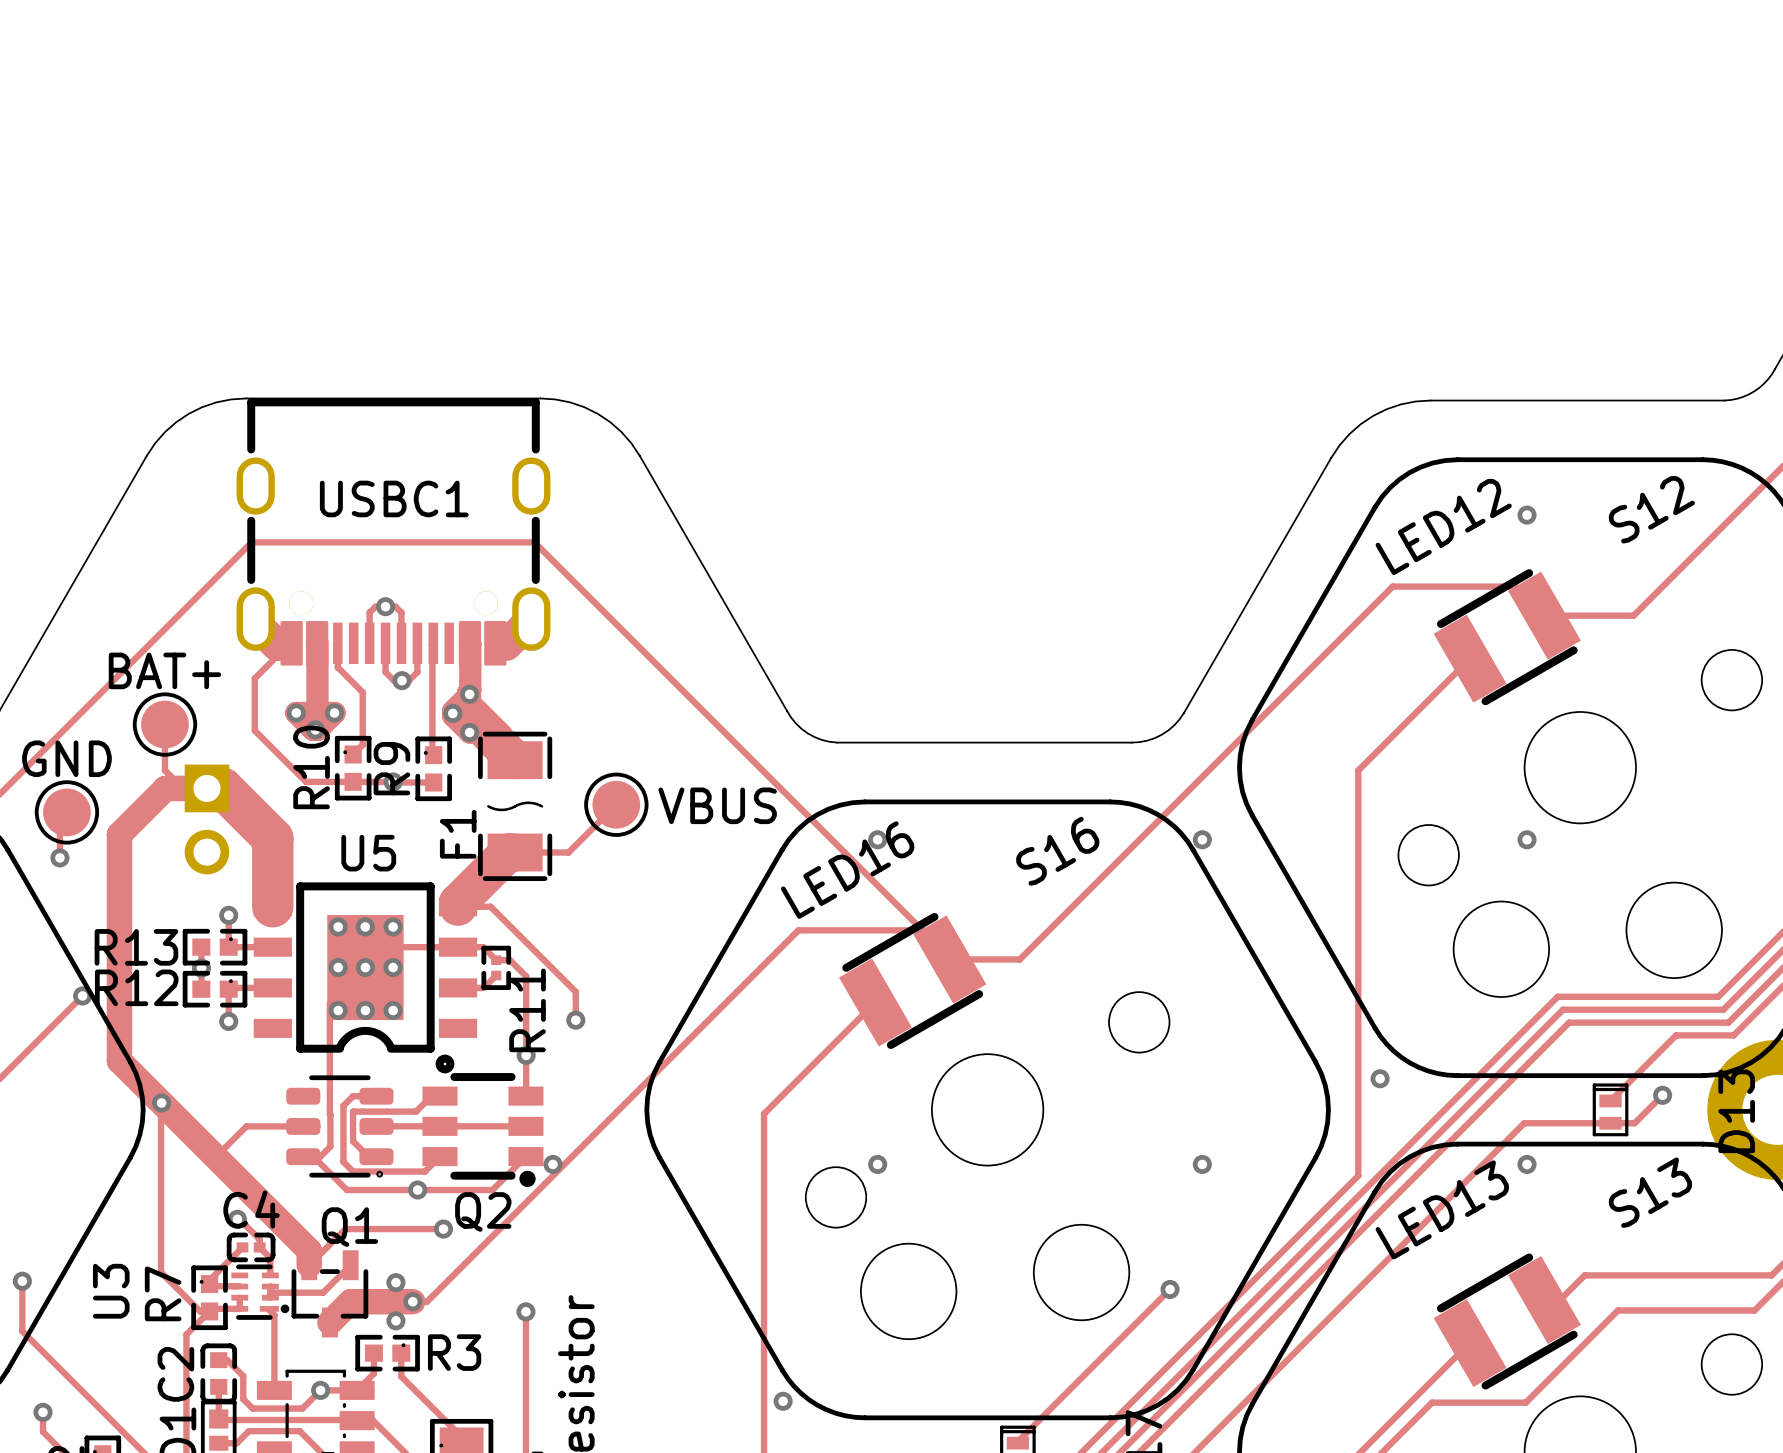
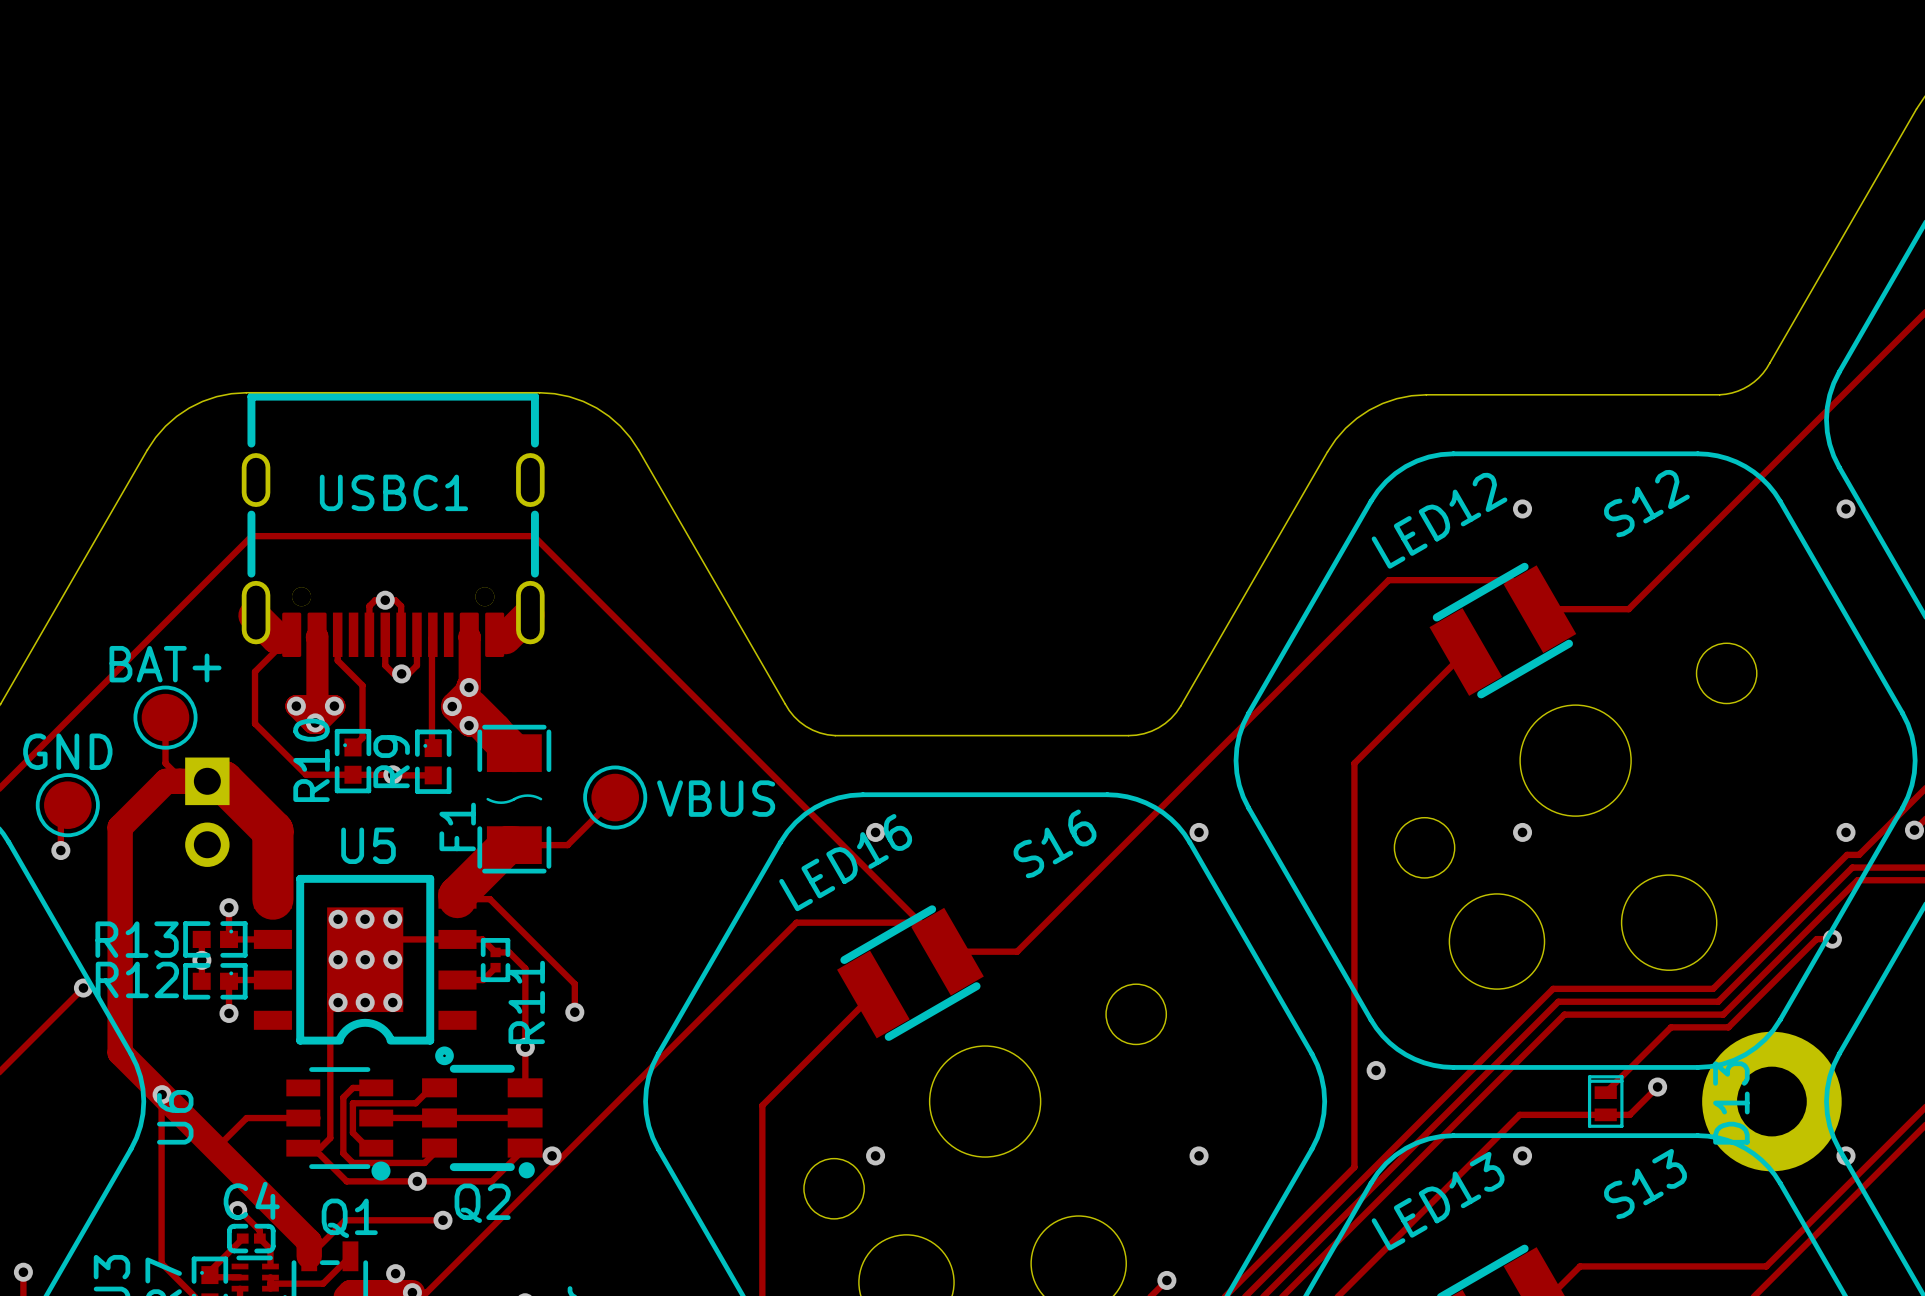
USBC1 footprint: [236, 398, 551, 666] -> [241, 392, 545, 657]
track: (329, 1003) (330, 1114) -> (365, 959) (330, 994) (330, 1106)
part: (339, 1126) -> none
U6: none -> (339, 1123)

